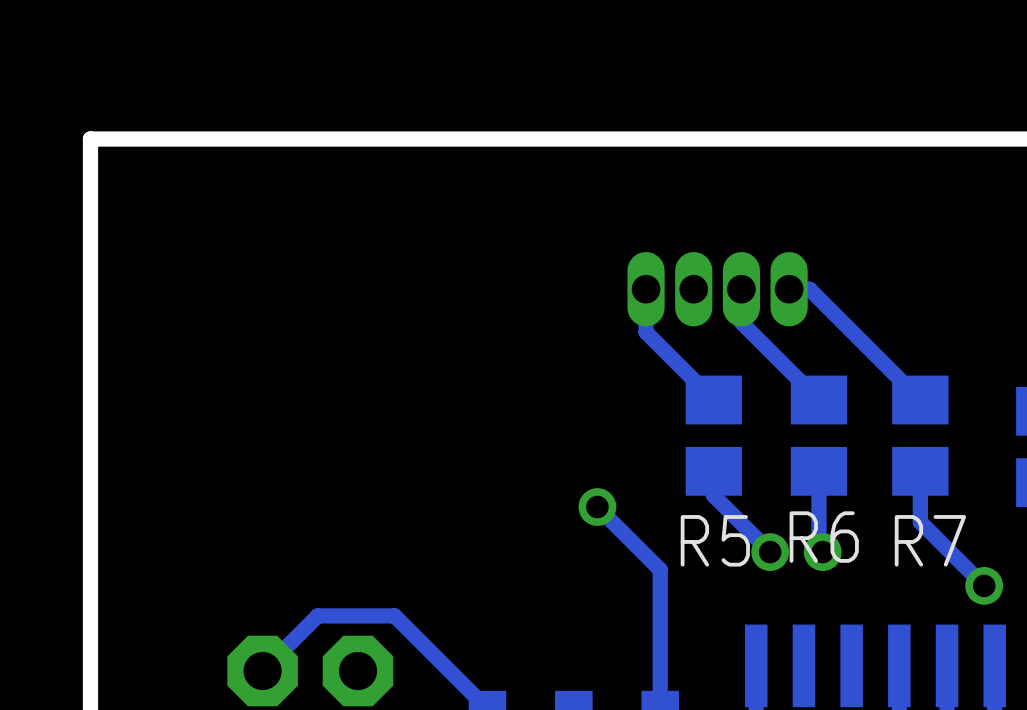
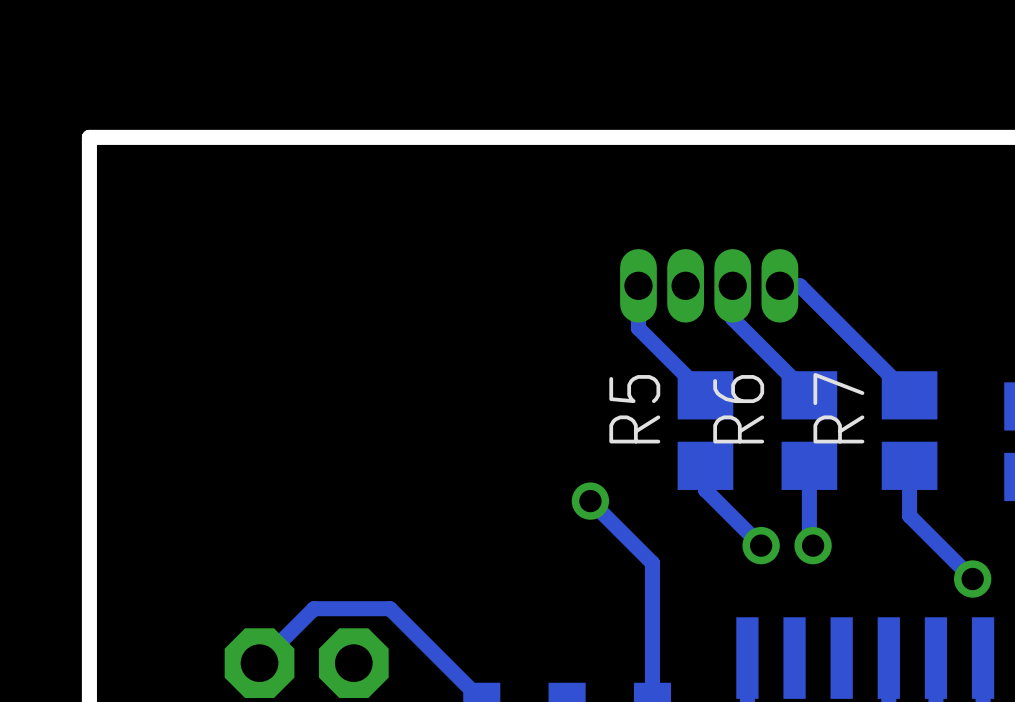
R6 name rotation: 0° (824, 537) -> 90° counterclockwise (738, 409)
R6 name position: R6 (824, 537) -> R6 (738, 409)
R5 name rotation: 0° (715, 540) -> 90° counterclockwise (634, 409)
R5 name position: R5 (715, 540) -> R5 (634, 409)
R7 name rotation: 0° (930, 540) -> 90° counterclockwise (838, 408)
R7 name position: R7 (930, 540) -> R7 (838, 408)

